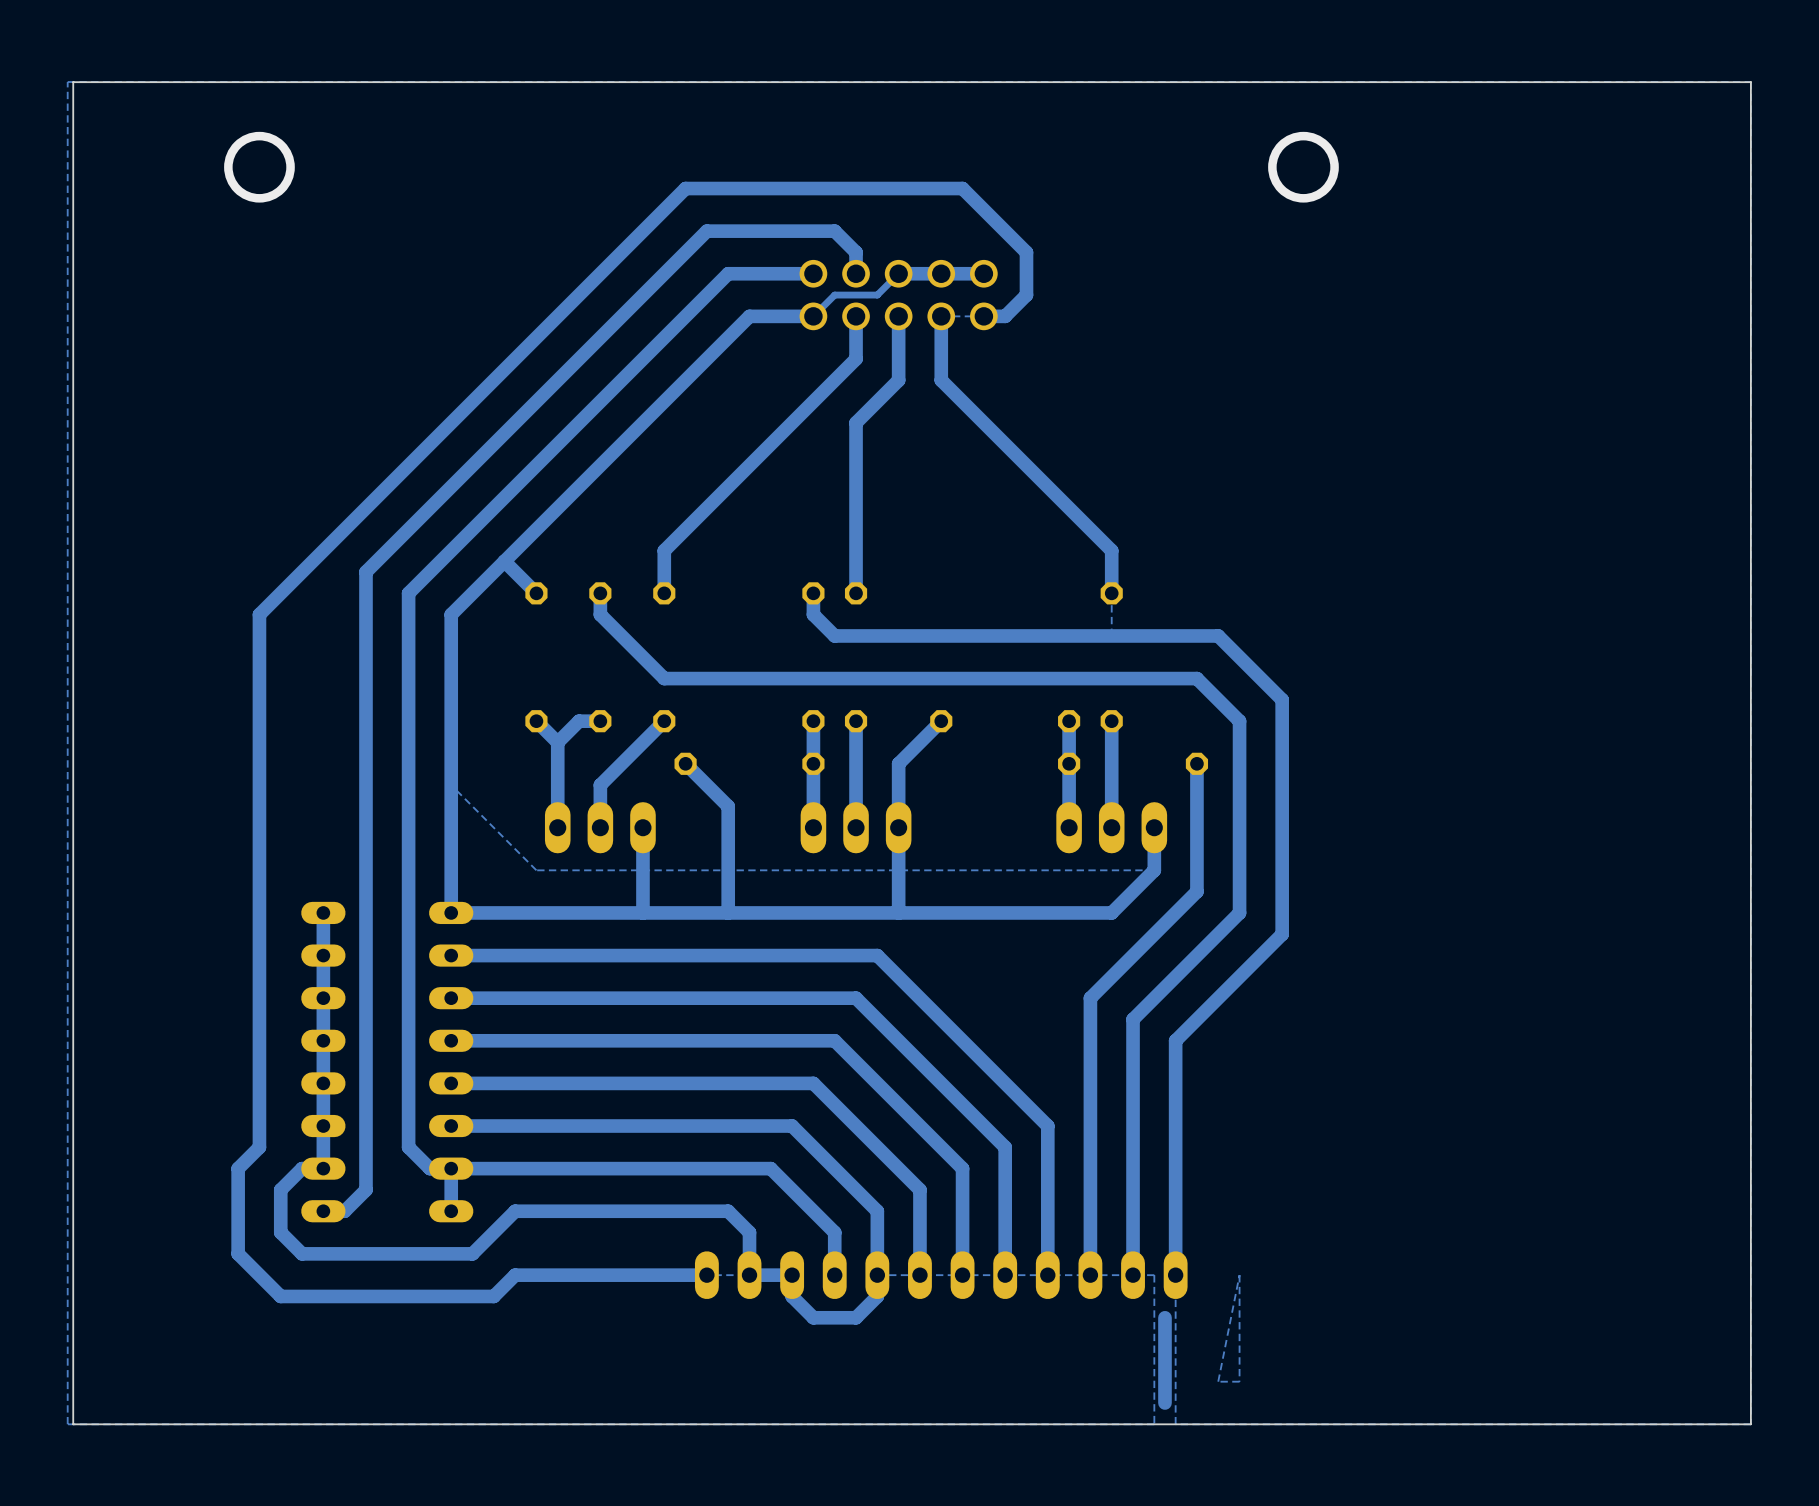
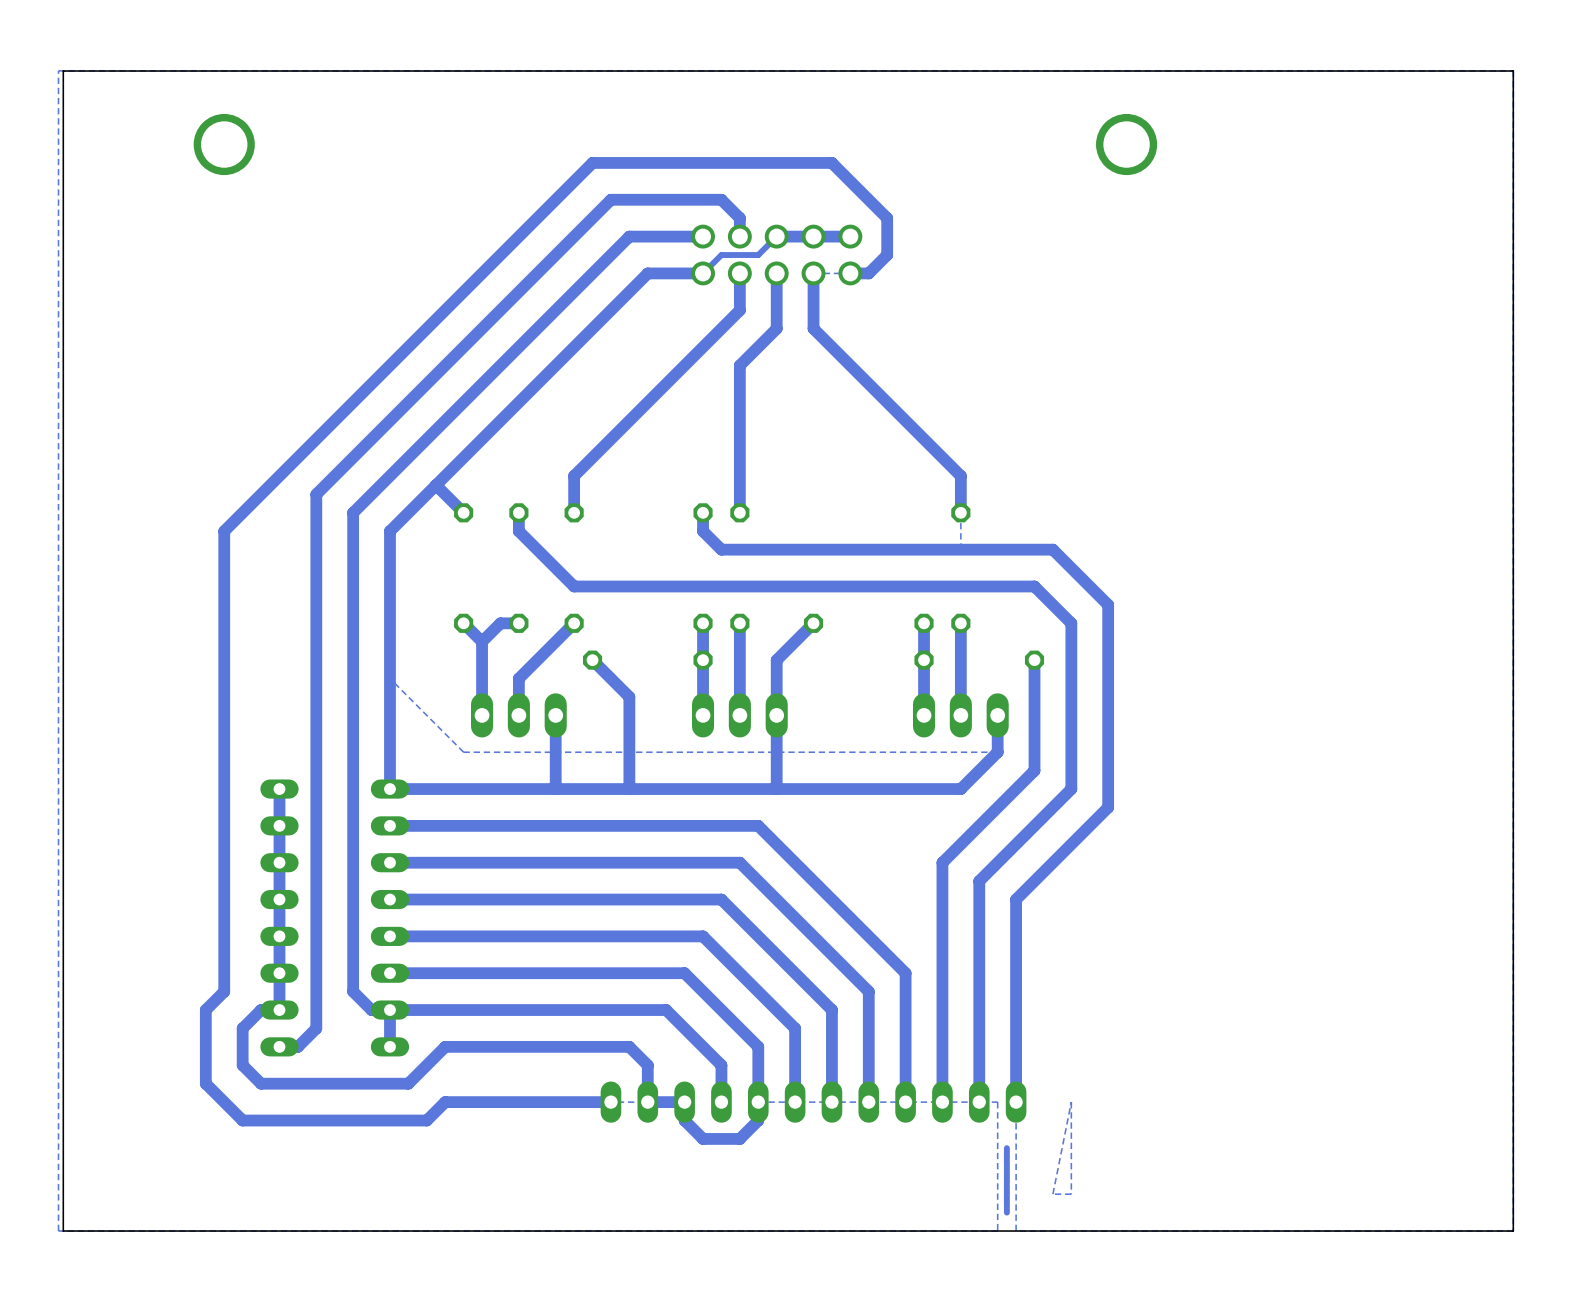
bottom track: (1164, 1317) (1164, 1328) -> none
bottom track width: thick (1164, 1328) (1164, 1403) -> thin (1006, 1148) (1006, 1212)

